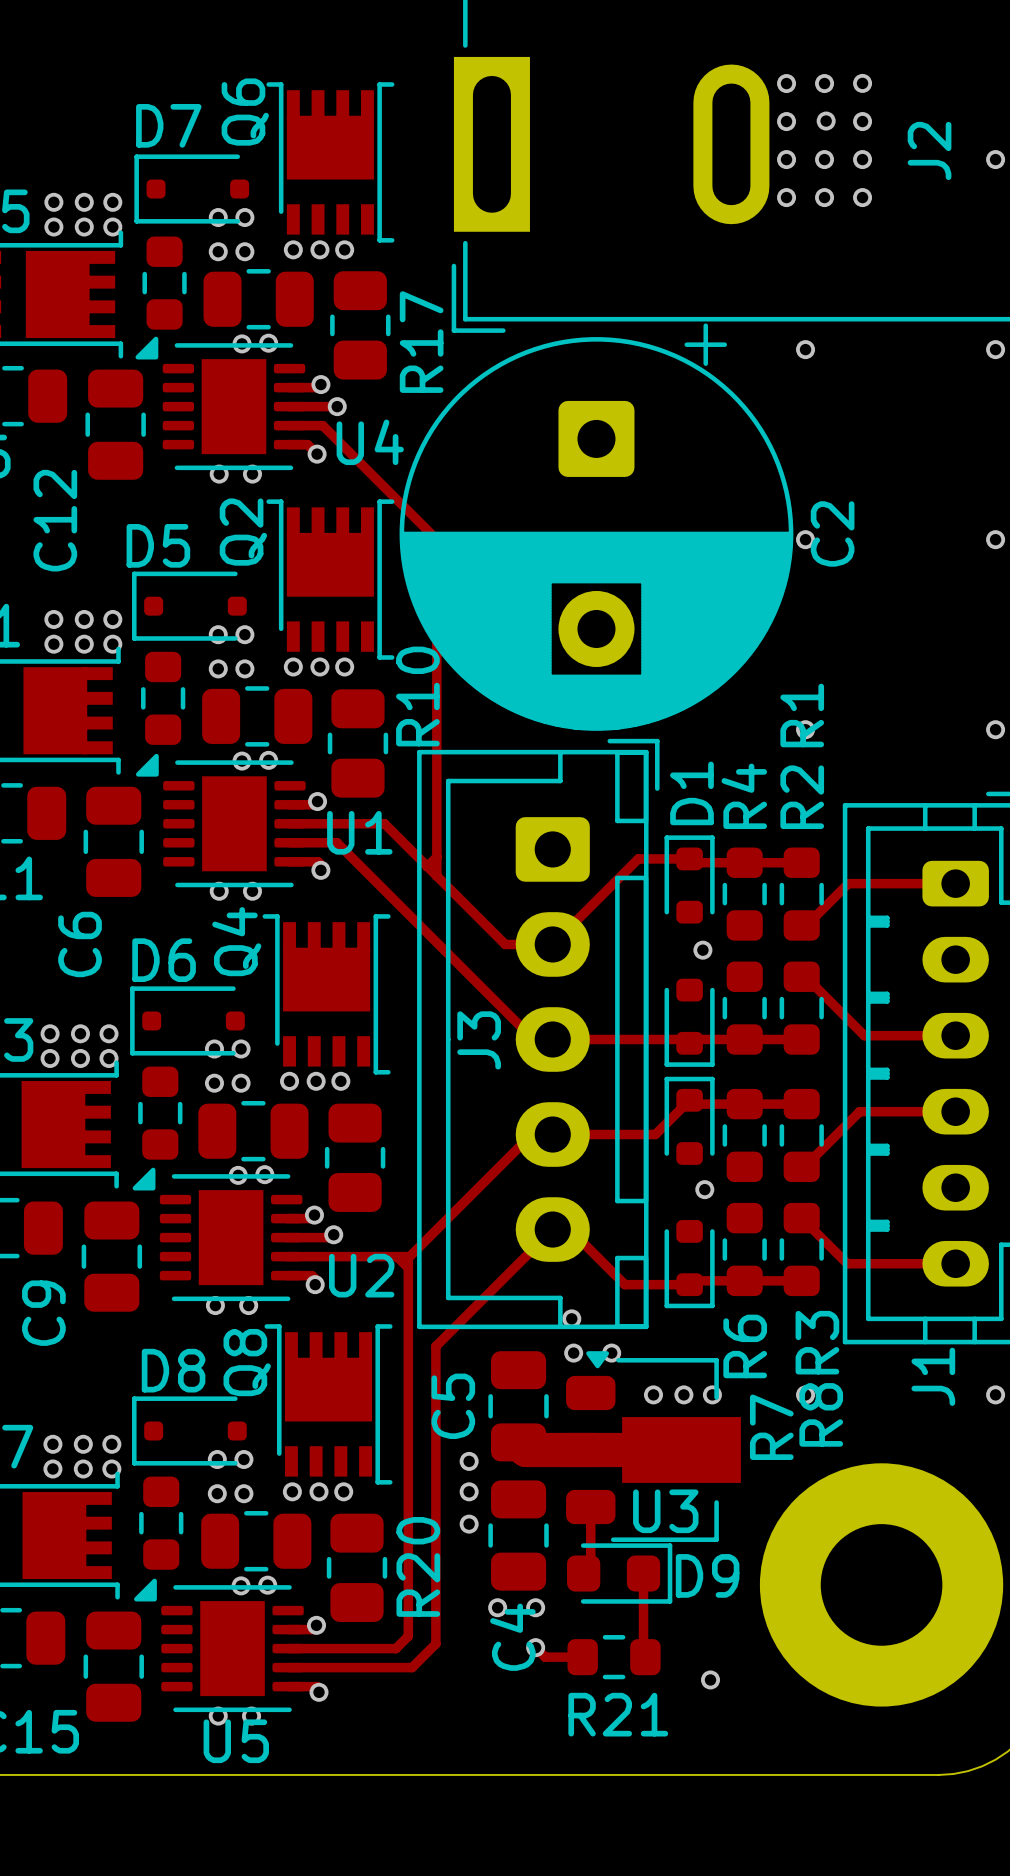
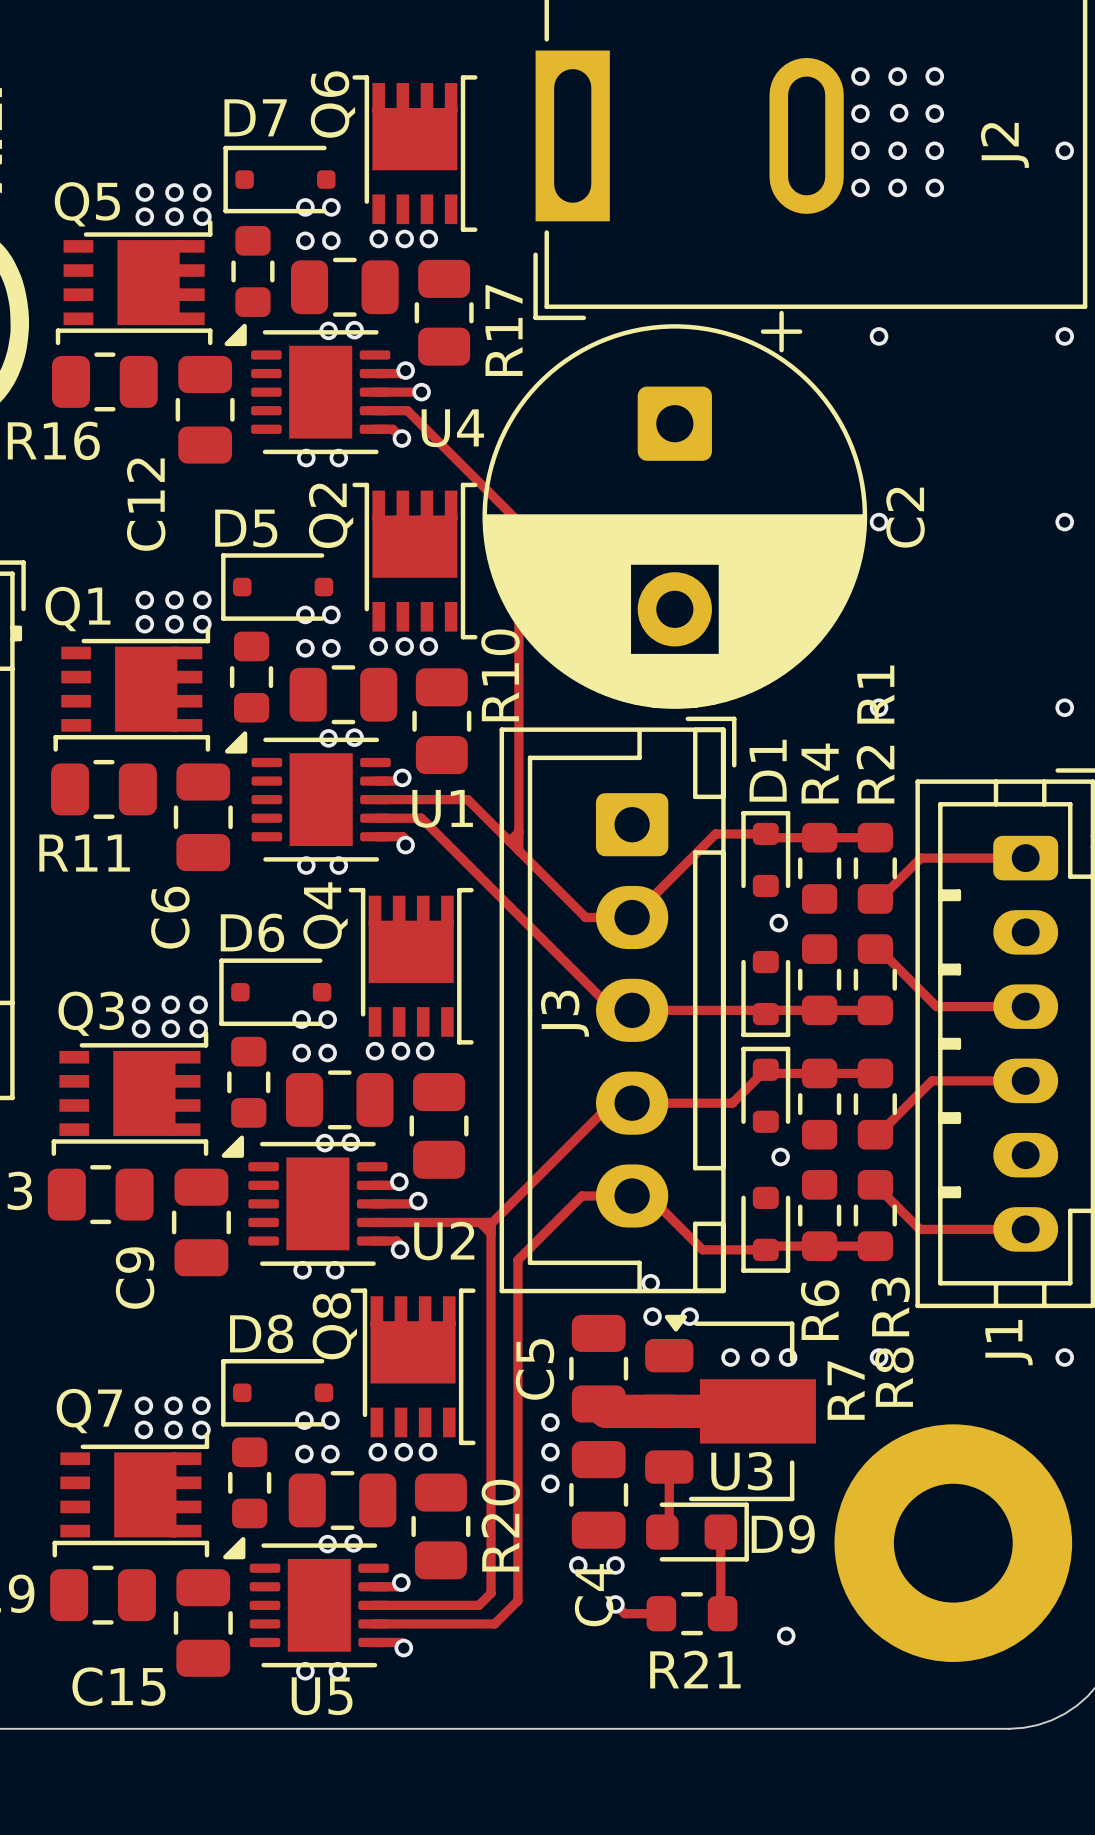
track: (552, 1229) (435, 1346) -> (632, 1195) (582, 1195) (517, 1260) (517, 1310)

